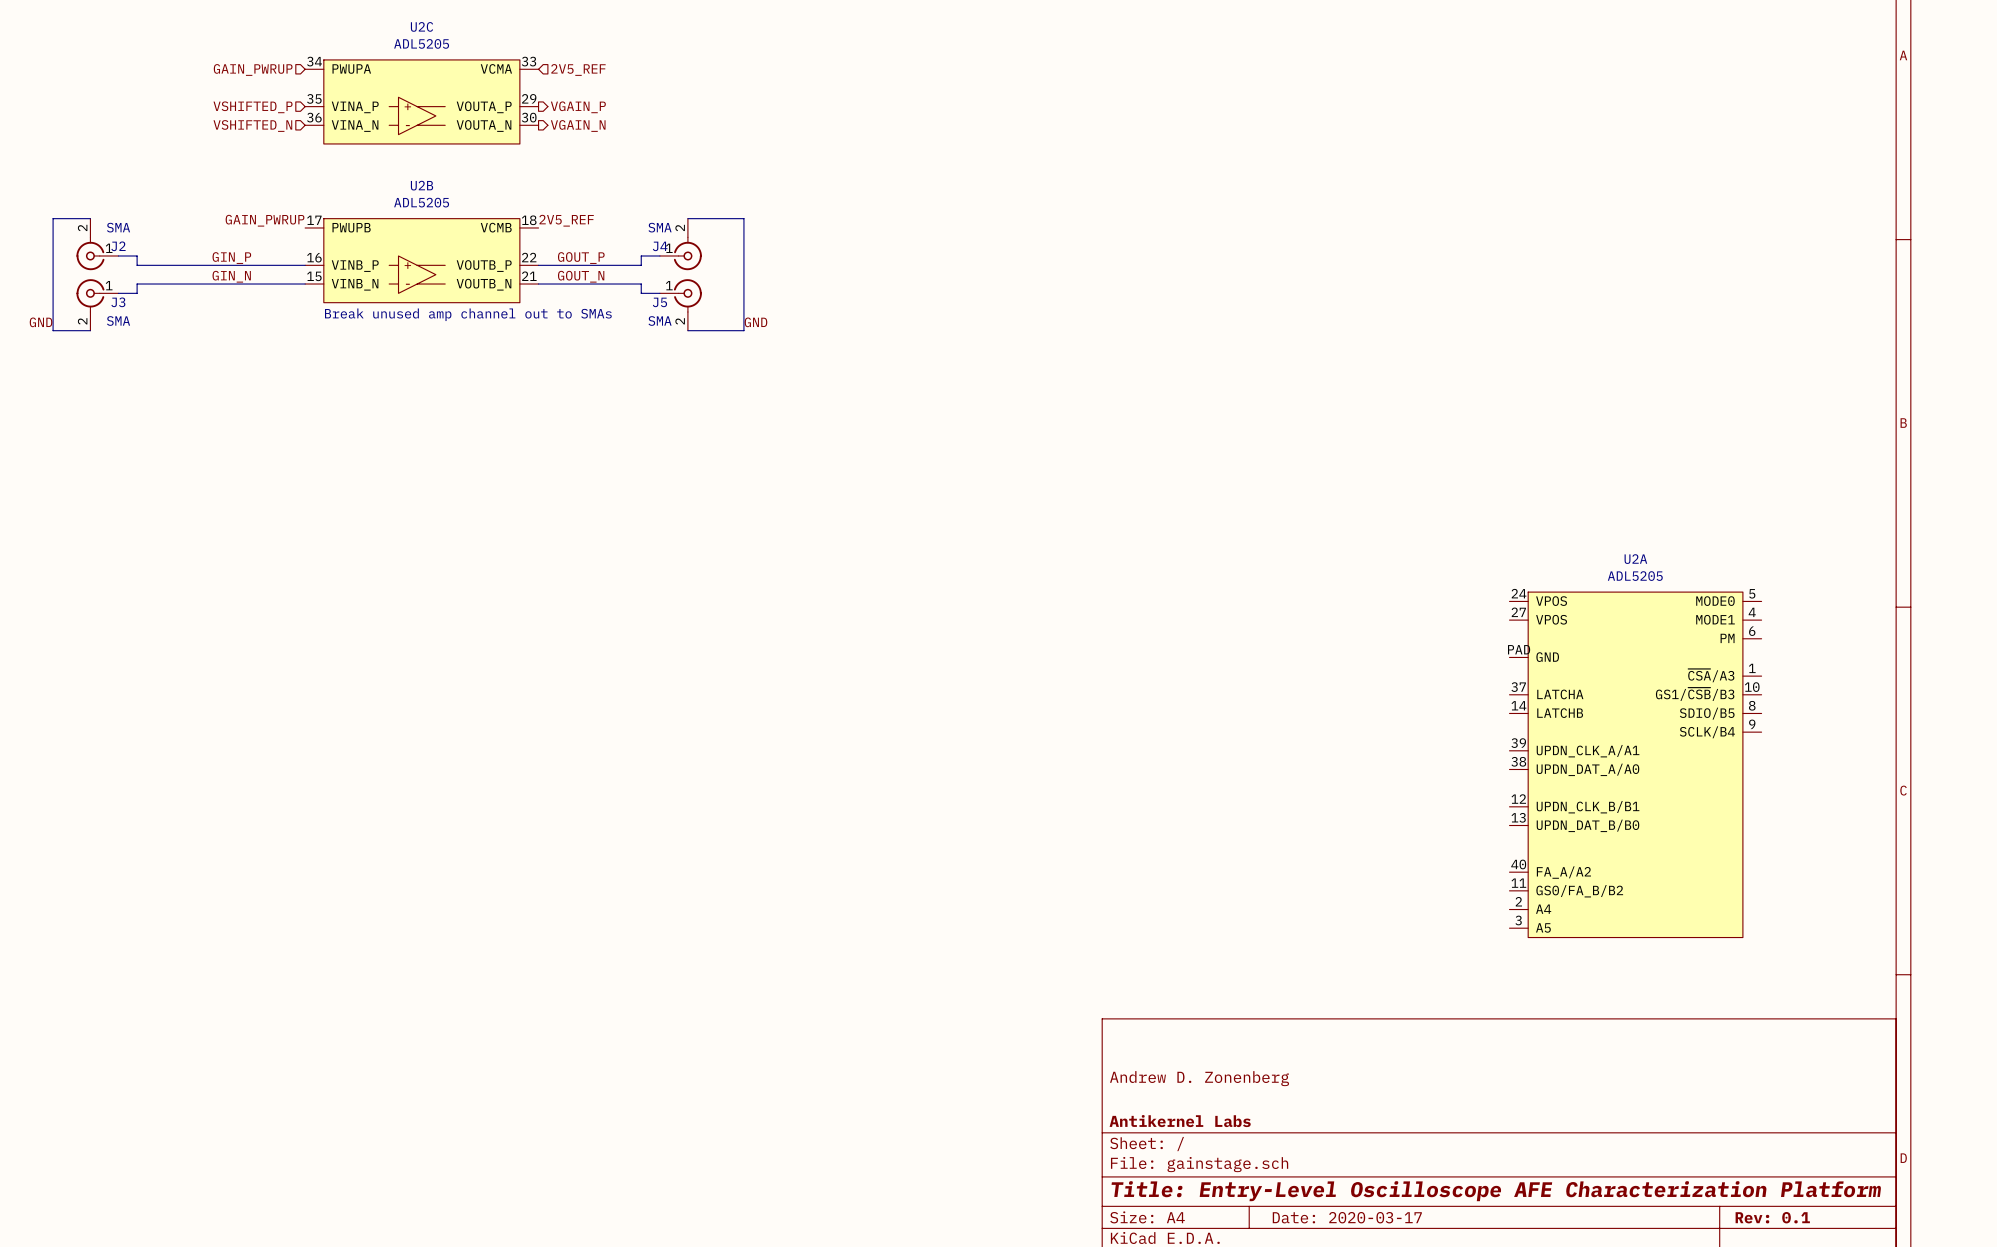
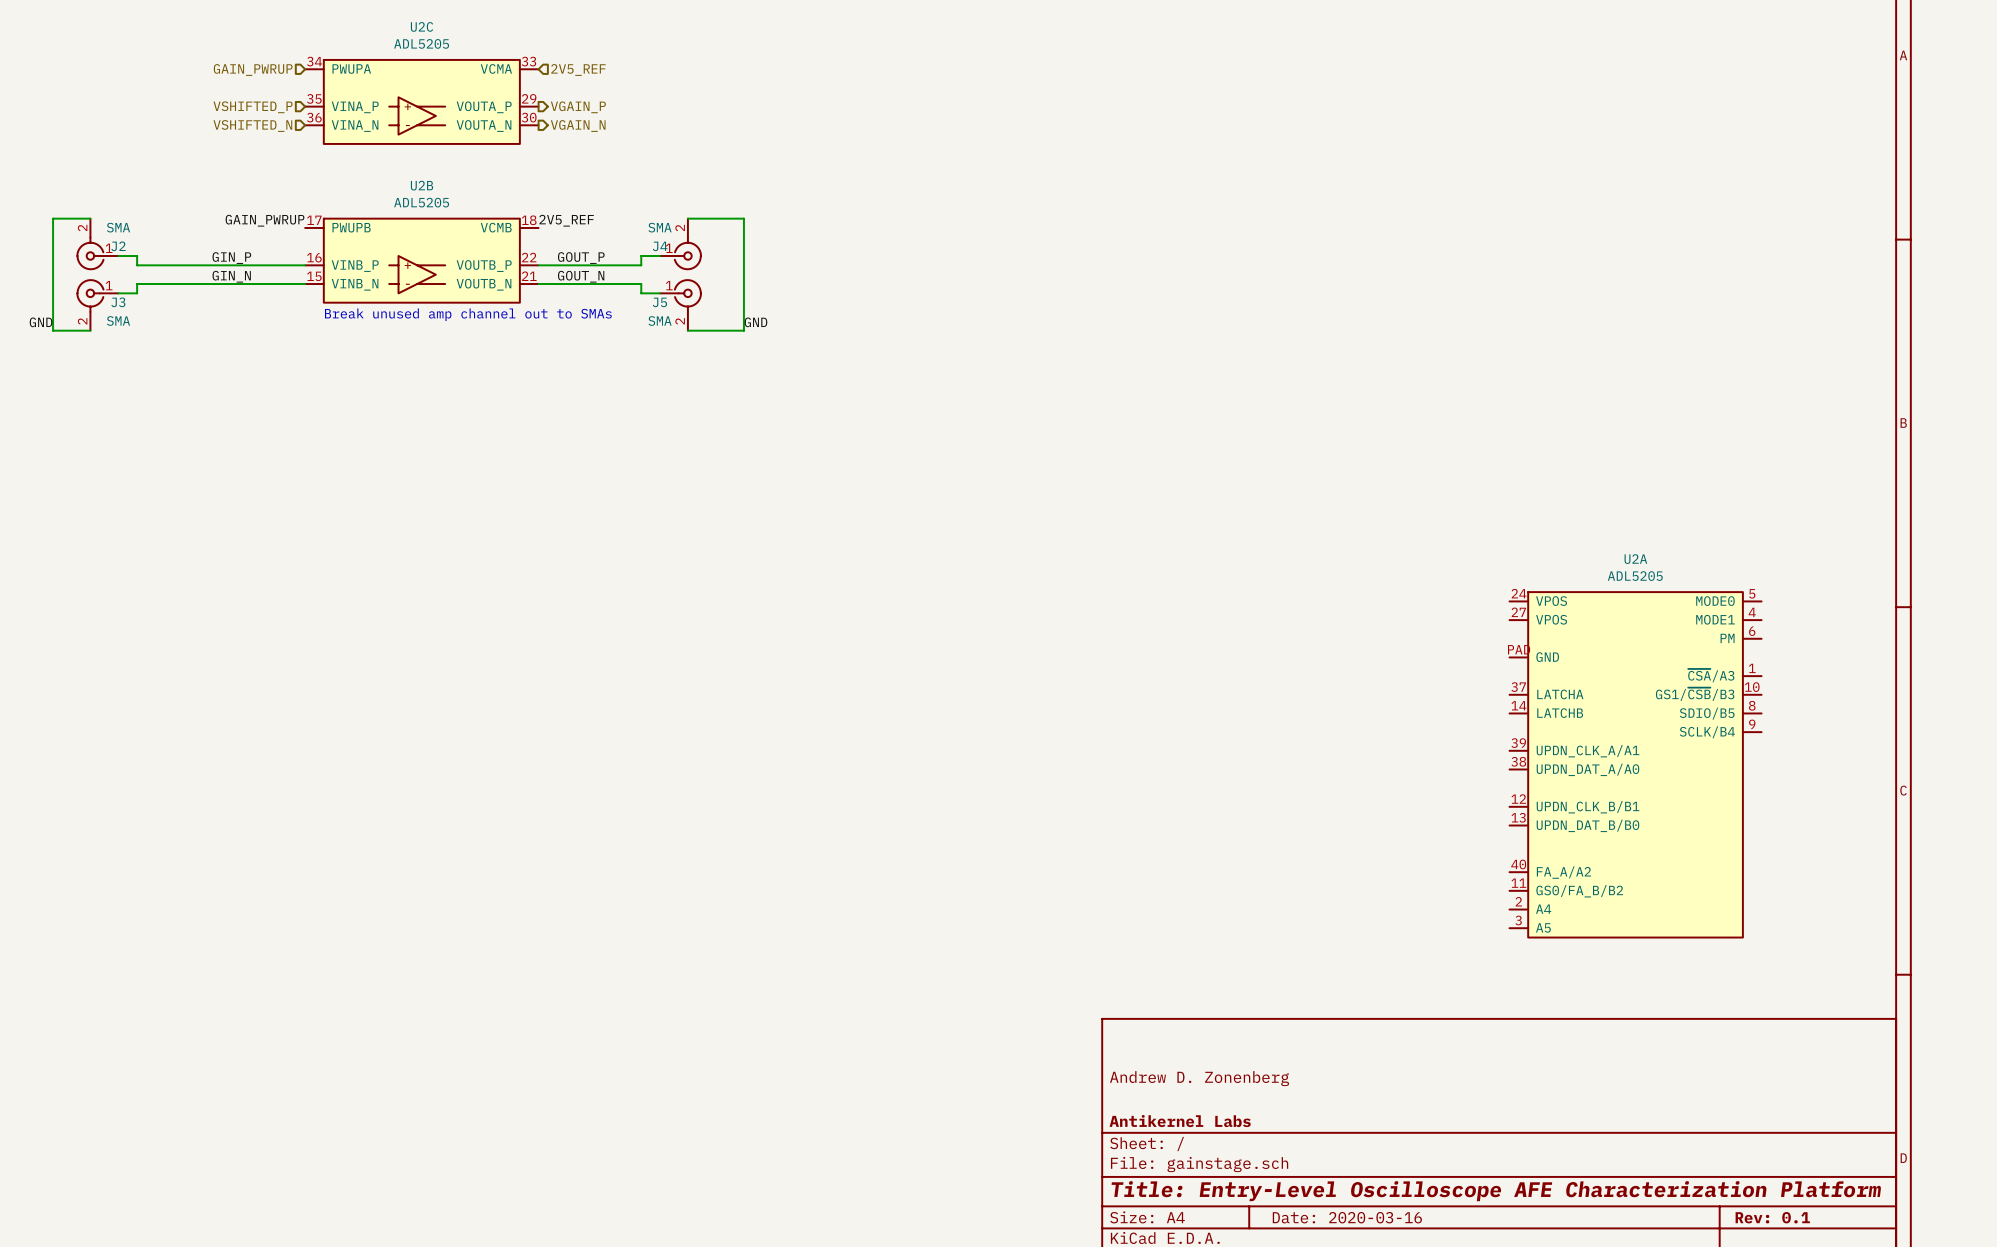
title block: Date: 2020-03-17 (1347, 1217) -> Date: 2020-03-16 (1347, 1217)

